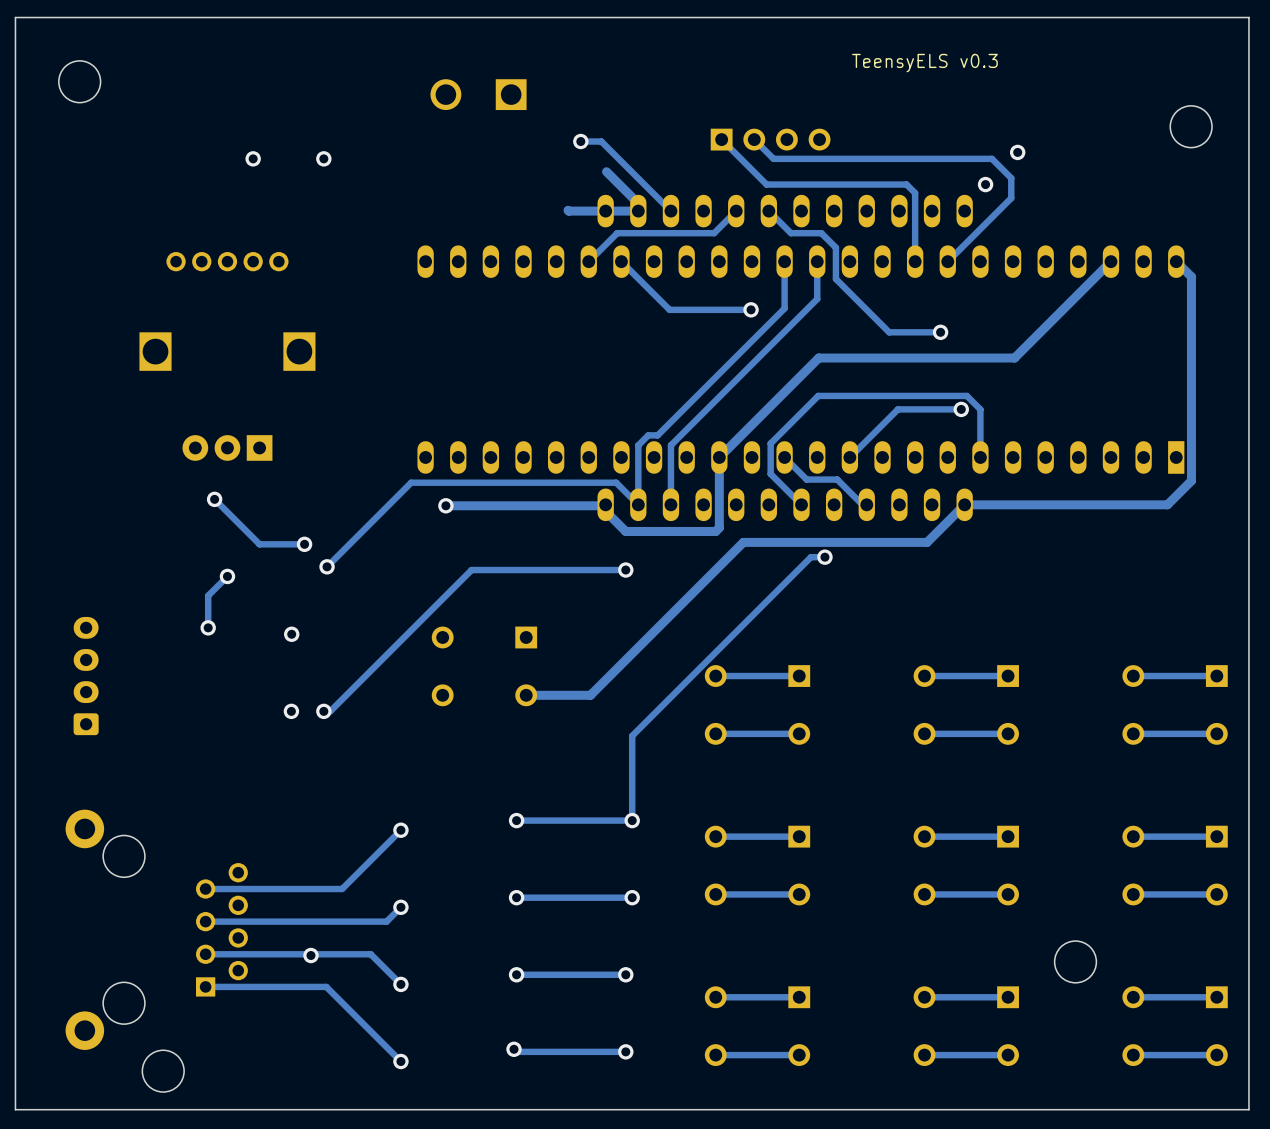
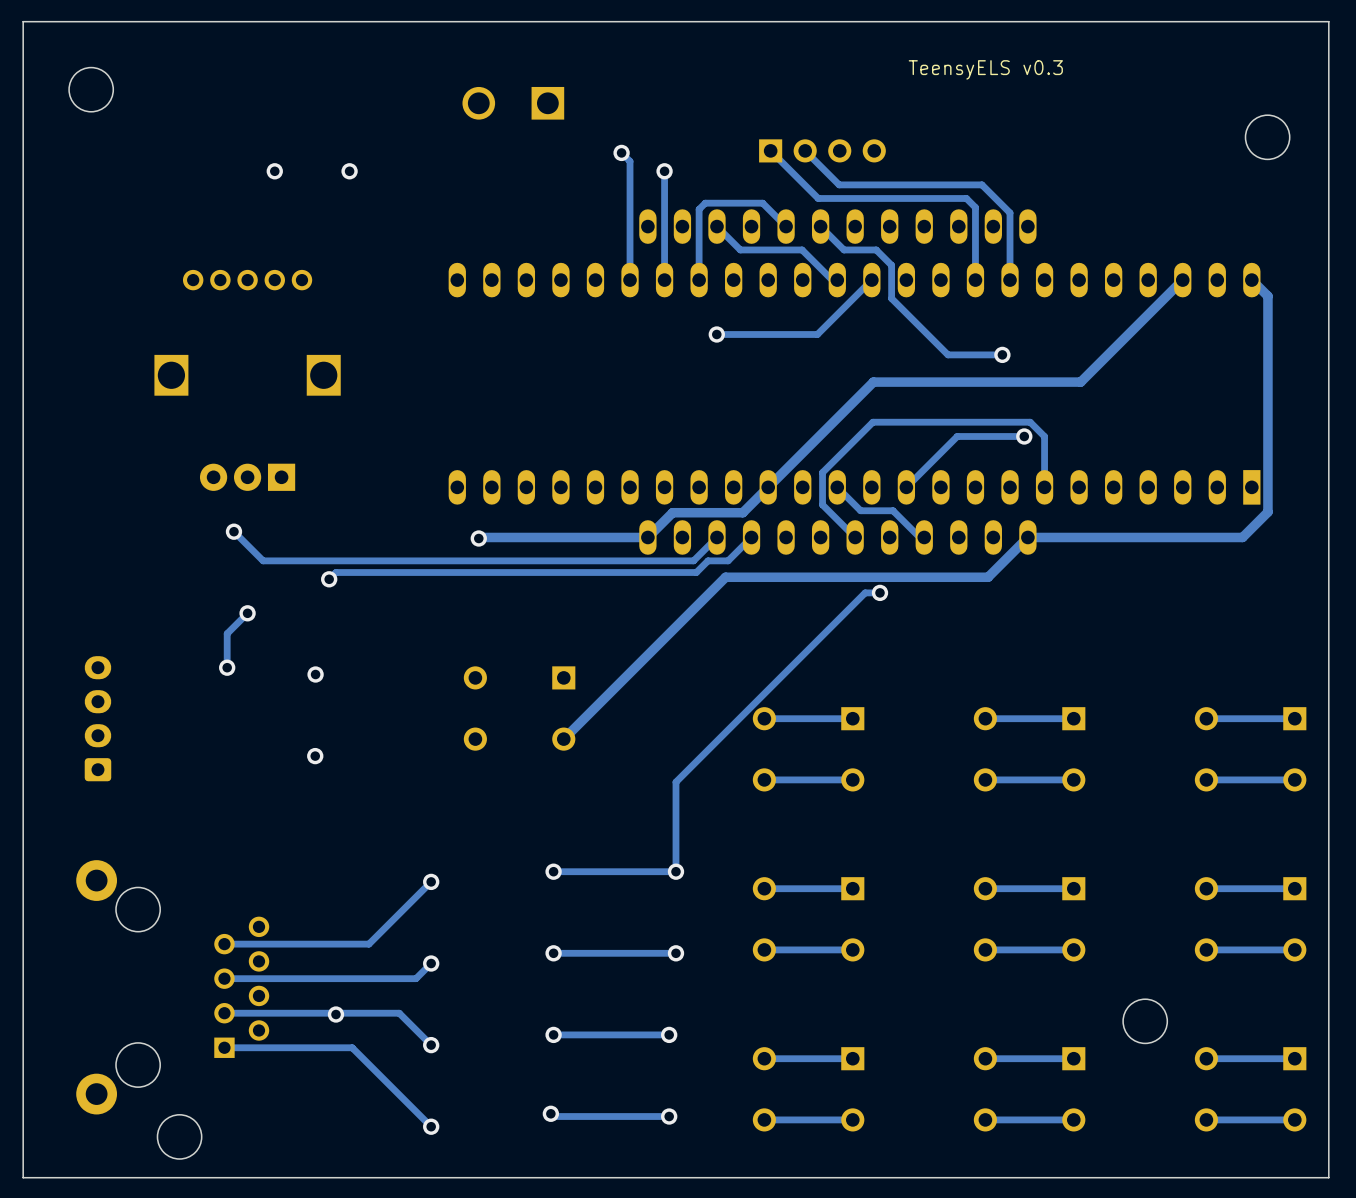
track: (580, 141) (601, 141) (670, 211) -> (621, 152) (630, 161) (630, 280)
via: (1017, 152) -> none
via: none -> (664, 171)
track: (773, 158) (991, 158) (1011, 178) (1011, 198) (947, 261) -> (825, 171) (839, 184) (982, 184) (1010, 212) (1010, 280)
track: (606, 171) (638, 203) (638, 211) (567, 210) -> none
via: (985, 184) -> none
track: (736, 211) (714, 233) -> (786, 226) (762, 203) (705, 203) (699, 209) (699, 280)
track: (693, 233) (617, 233) (588, 261) -> (740, 249) (716, 226)
track: (621, 261) (669, 309) (751, 309) -> (664, 280) (664, 171)
track: (784, 261) (784, 308) (657, 435) (648, 435) (638, 445) (638, 504) (616, 482) (411, 482) (323, 570) -> (837, 280) (832, 280) (802, 249) (762, 249)
track: (817, 261) (817, 299) (670, 445) (670, 504) -> (871, 280) (817, 334) (716, 334)
via: (751, 309) -> none
via: none -> (716, 334)
track: (719, 457) (719, 527) (715, 531) (625, 531) (605, 511) (605, 504) (445, 505) -> (768, 487) (742, 512) (672, 512) (647, 537) (478, 538)
track: none -> (751, 537) (728, 560) (708, 560) (696, 572) (335, 572) (329, 579)
track: (242, 526) (259, 544) (304, 544) -> (263, 560) (693, 560) (716, 537)
track: (743, 542) (590, 695) (526, 695) -> (793, 577) (725, 577) (563, 739)
via: (327, 566) -> none
track: (625, 570) (471, 570) (330, 711) (323, 711) -> none
via: (625, 570) -> none
via: (323, 711) -> none

